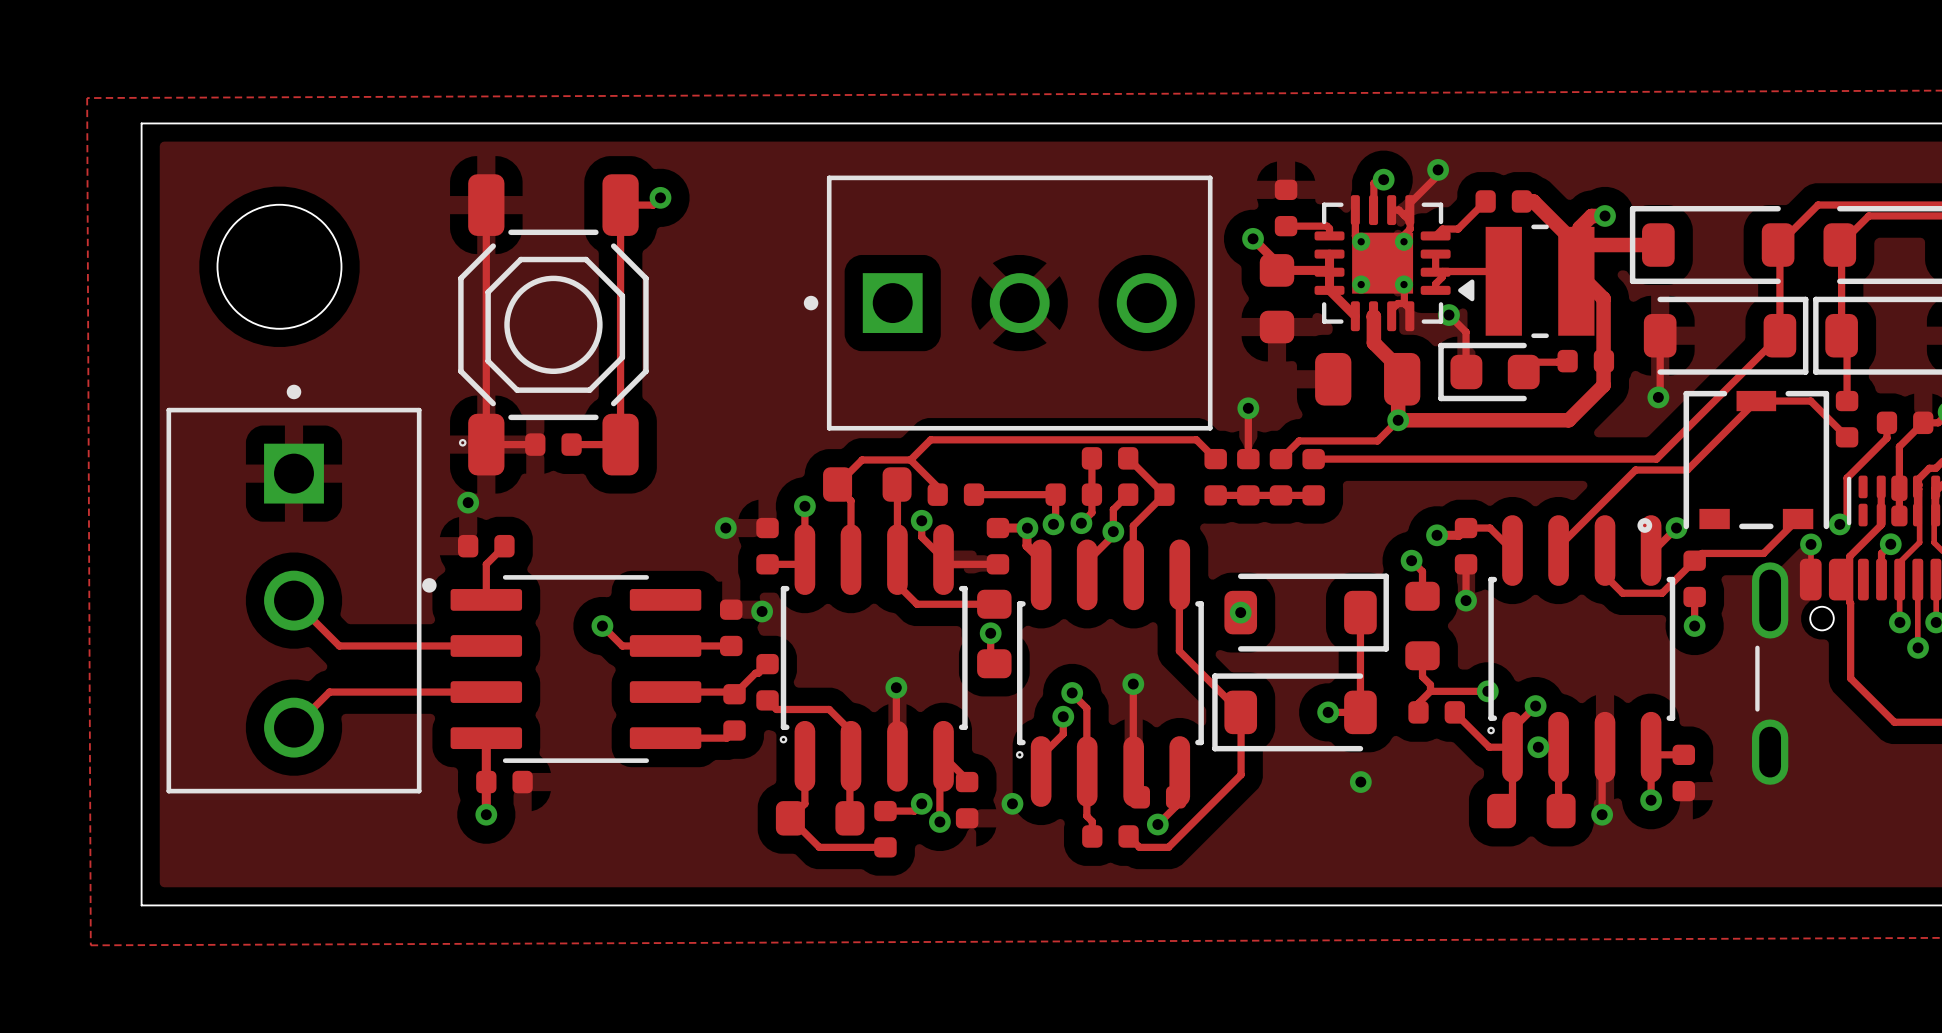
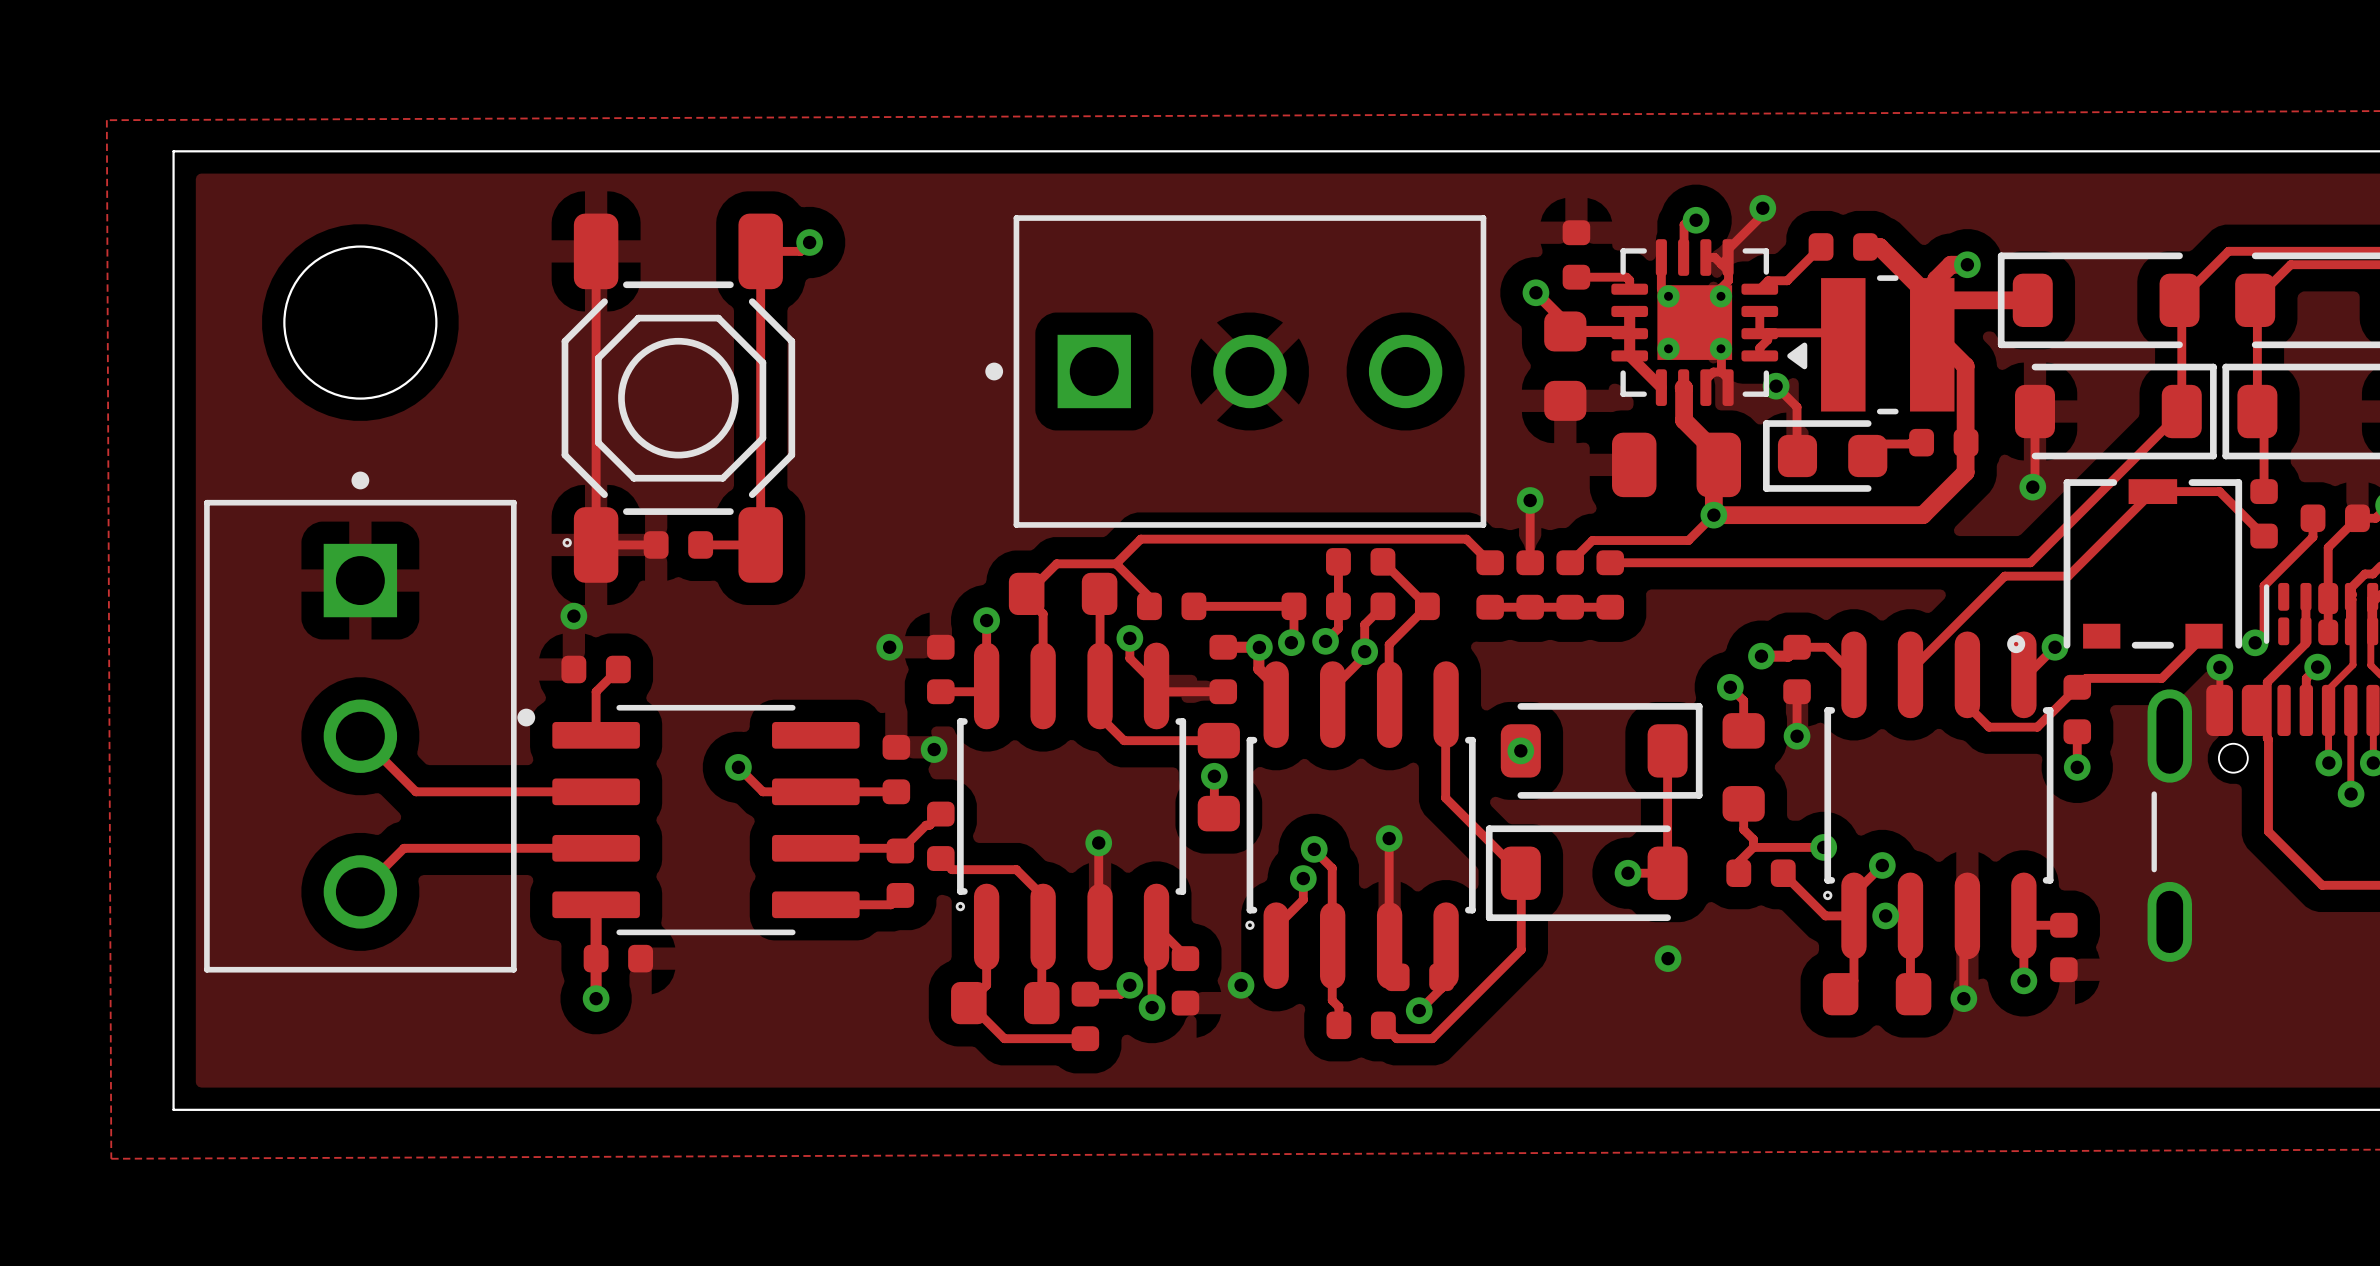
round board edge position: (279, 266) -> (360, 322)

